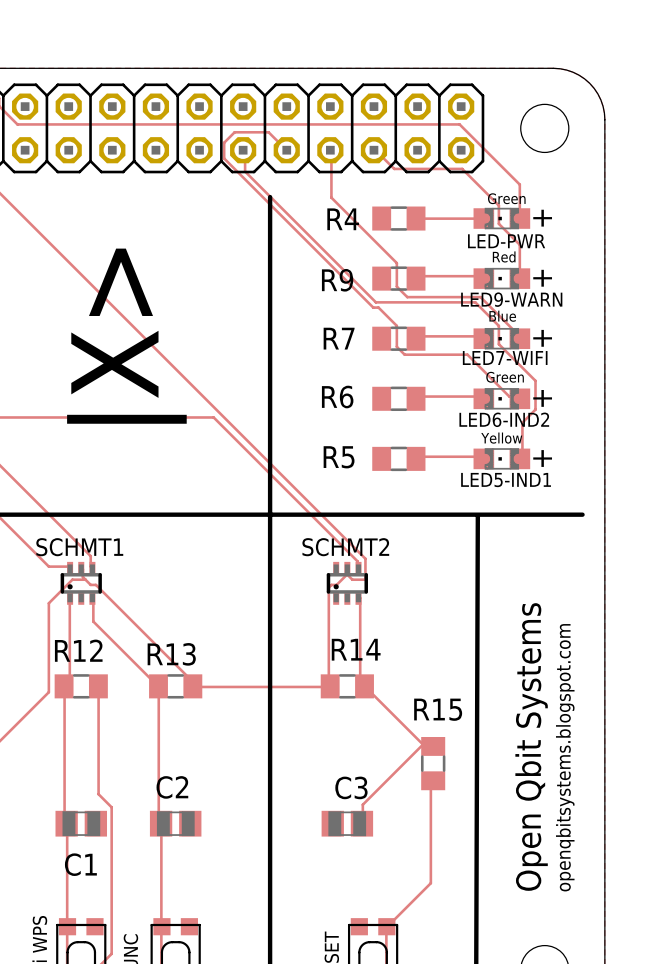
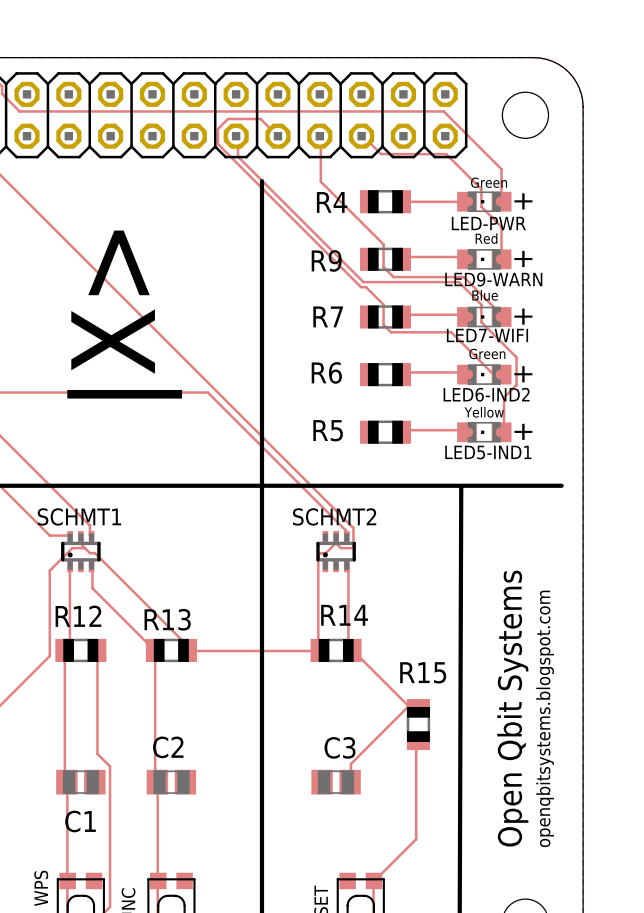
R4 footprint: [372, 206, 426, 231] -> [359, 190, 412, 214]
R9 footprint: [372, 266, 426, 291] -> [359, 247, 412, 272]
R7 footprint: [372, 326, 426, 351] -> [359, 305, 412, 329]
R6 footprint: [372, 386, 426, 412] -> [359, 362, 412, 387]
R5 footprint: [372, 446, 426, 472] -> [359, 420, 412, 444]
R12 footprint: [54, 674, 108, 699] -> [55, 638, 107, 663]
R13 footprint: [149, 674, 203, 699] -> [145, 638, 197, 663]
R14 footprint: [320, 674, 374, 699] -> [310, 638, 362, 663]
R15 footprint: [420, 737, 446, 791] -> [406, 699, 431, 751]

